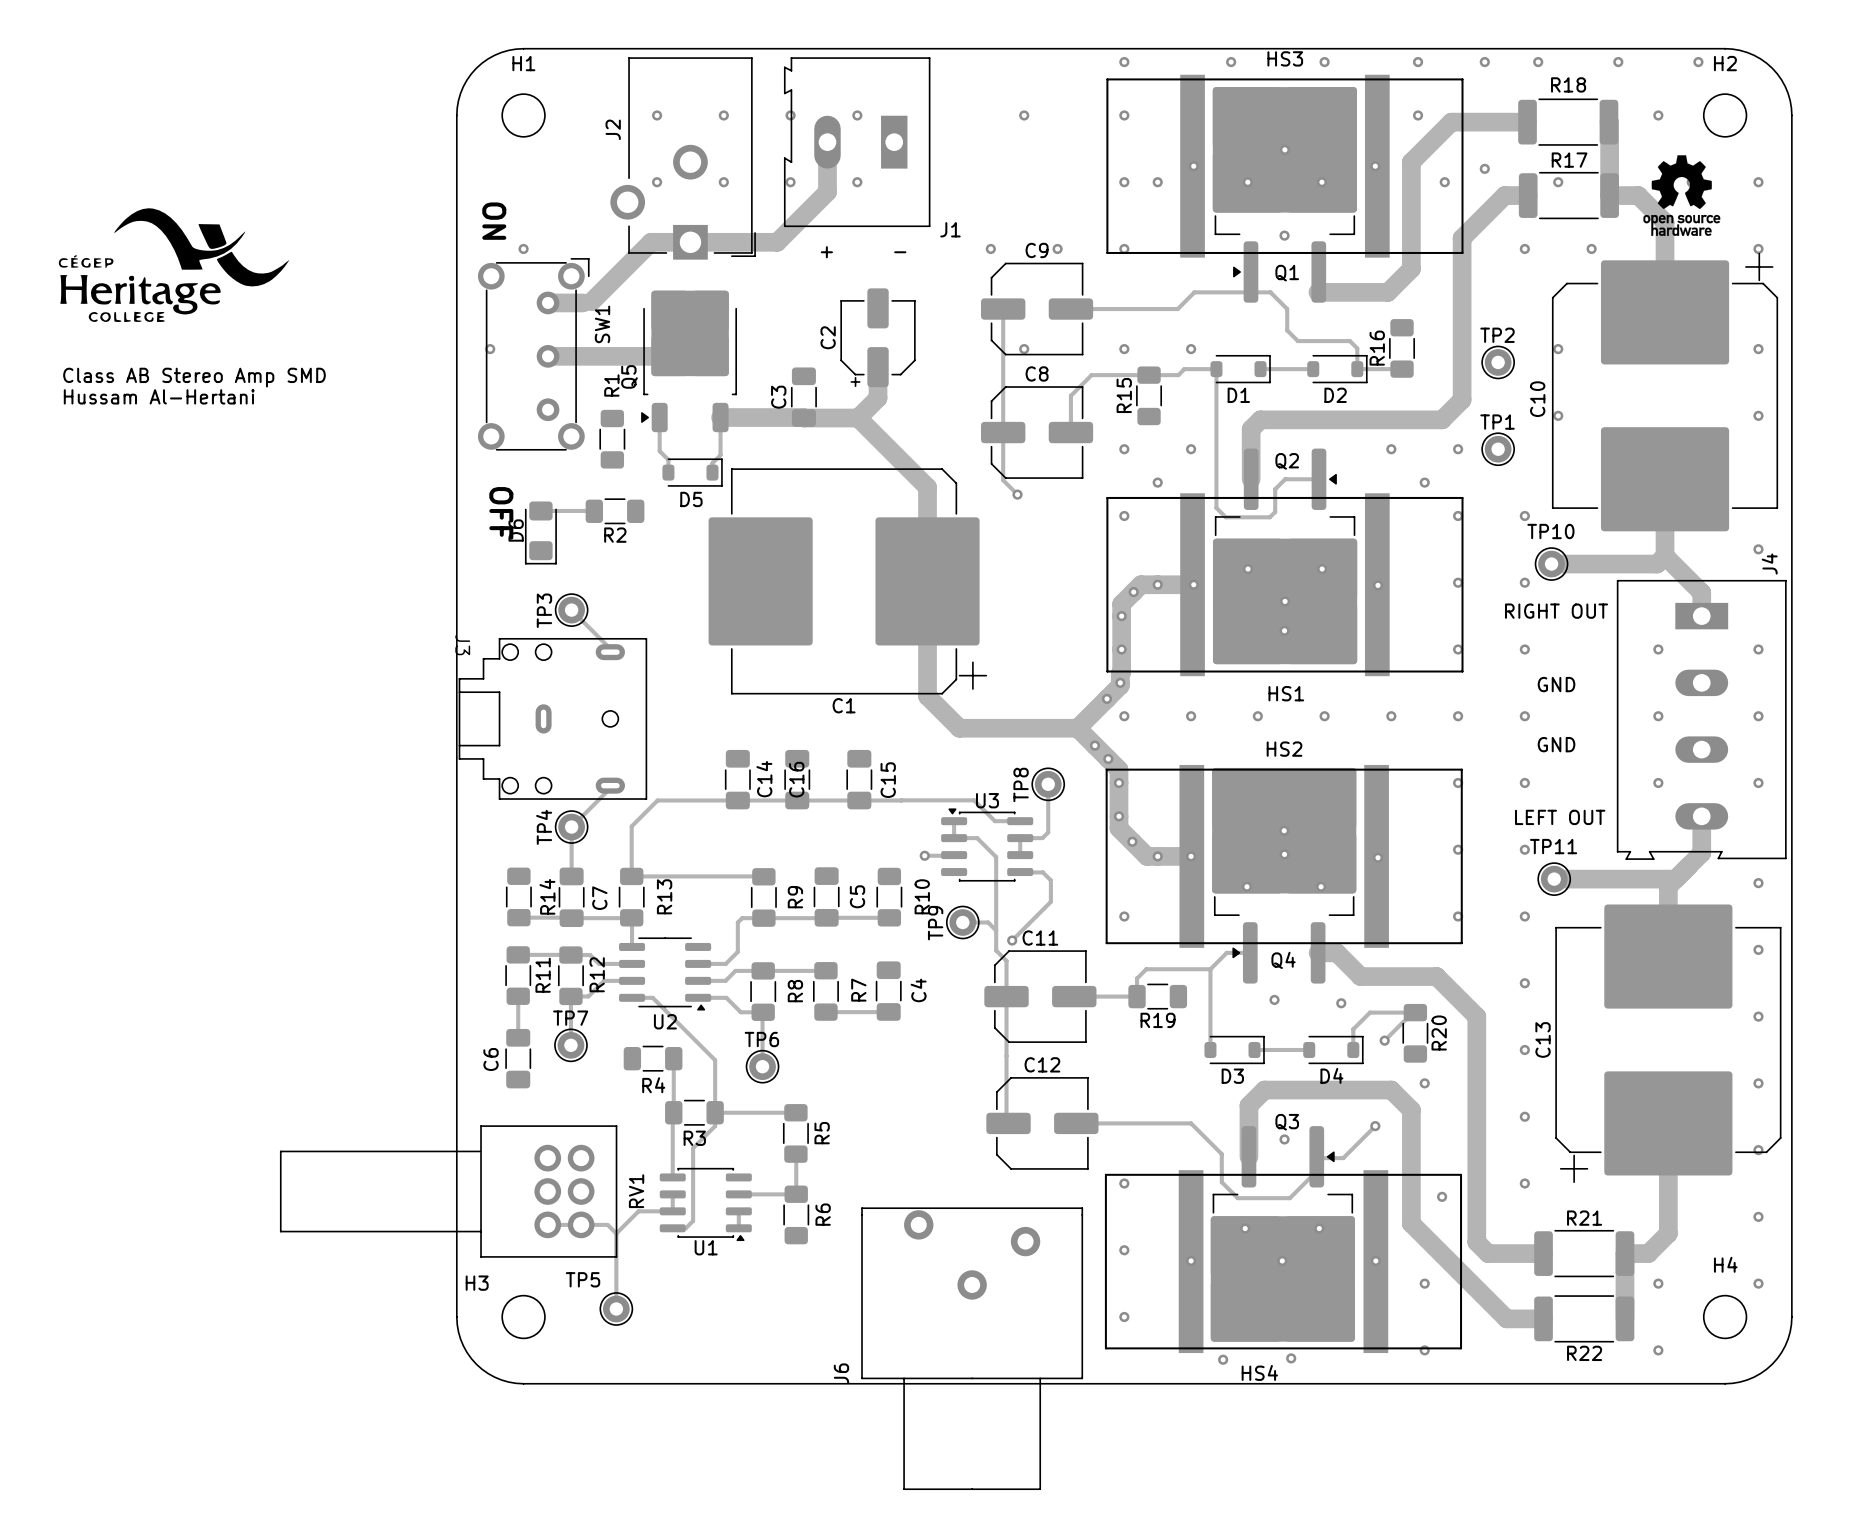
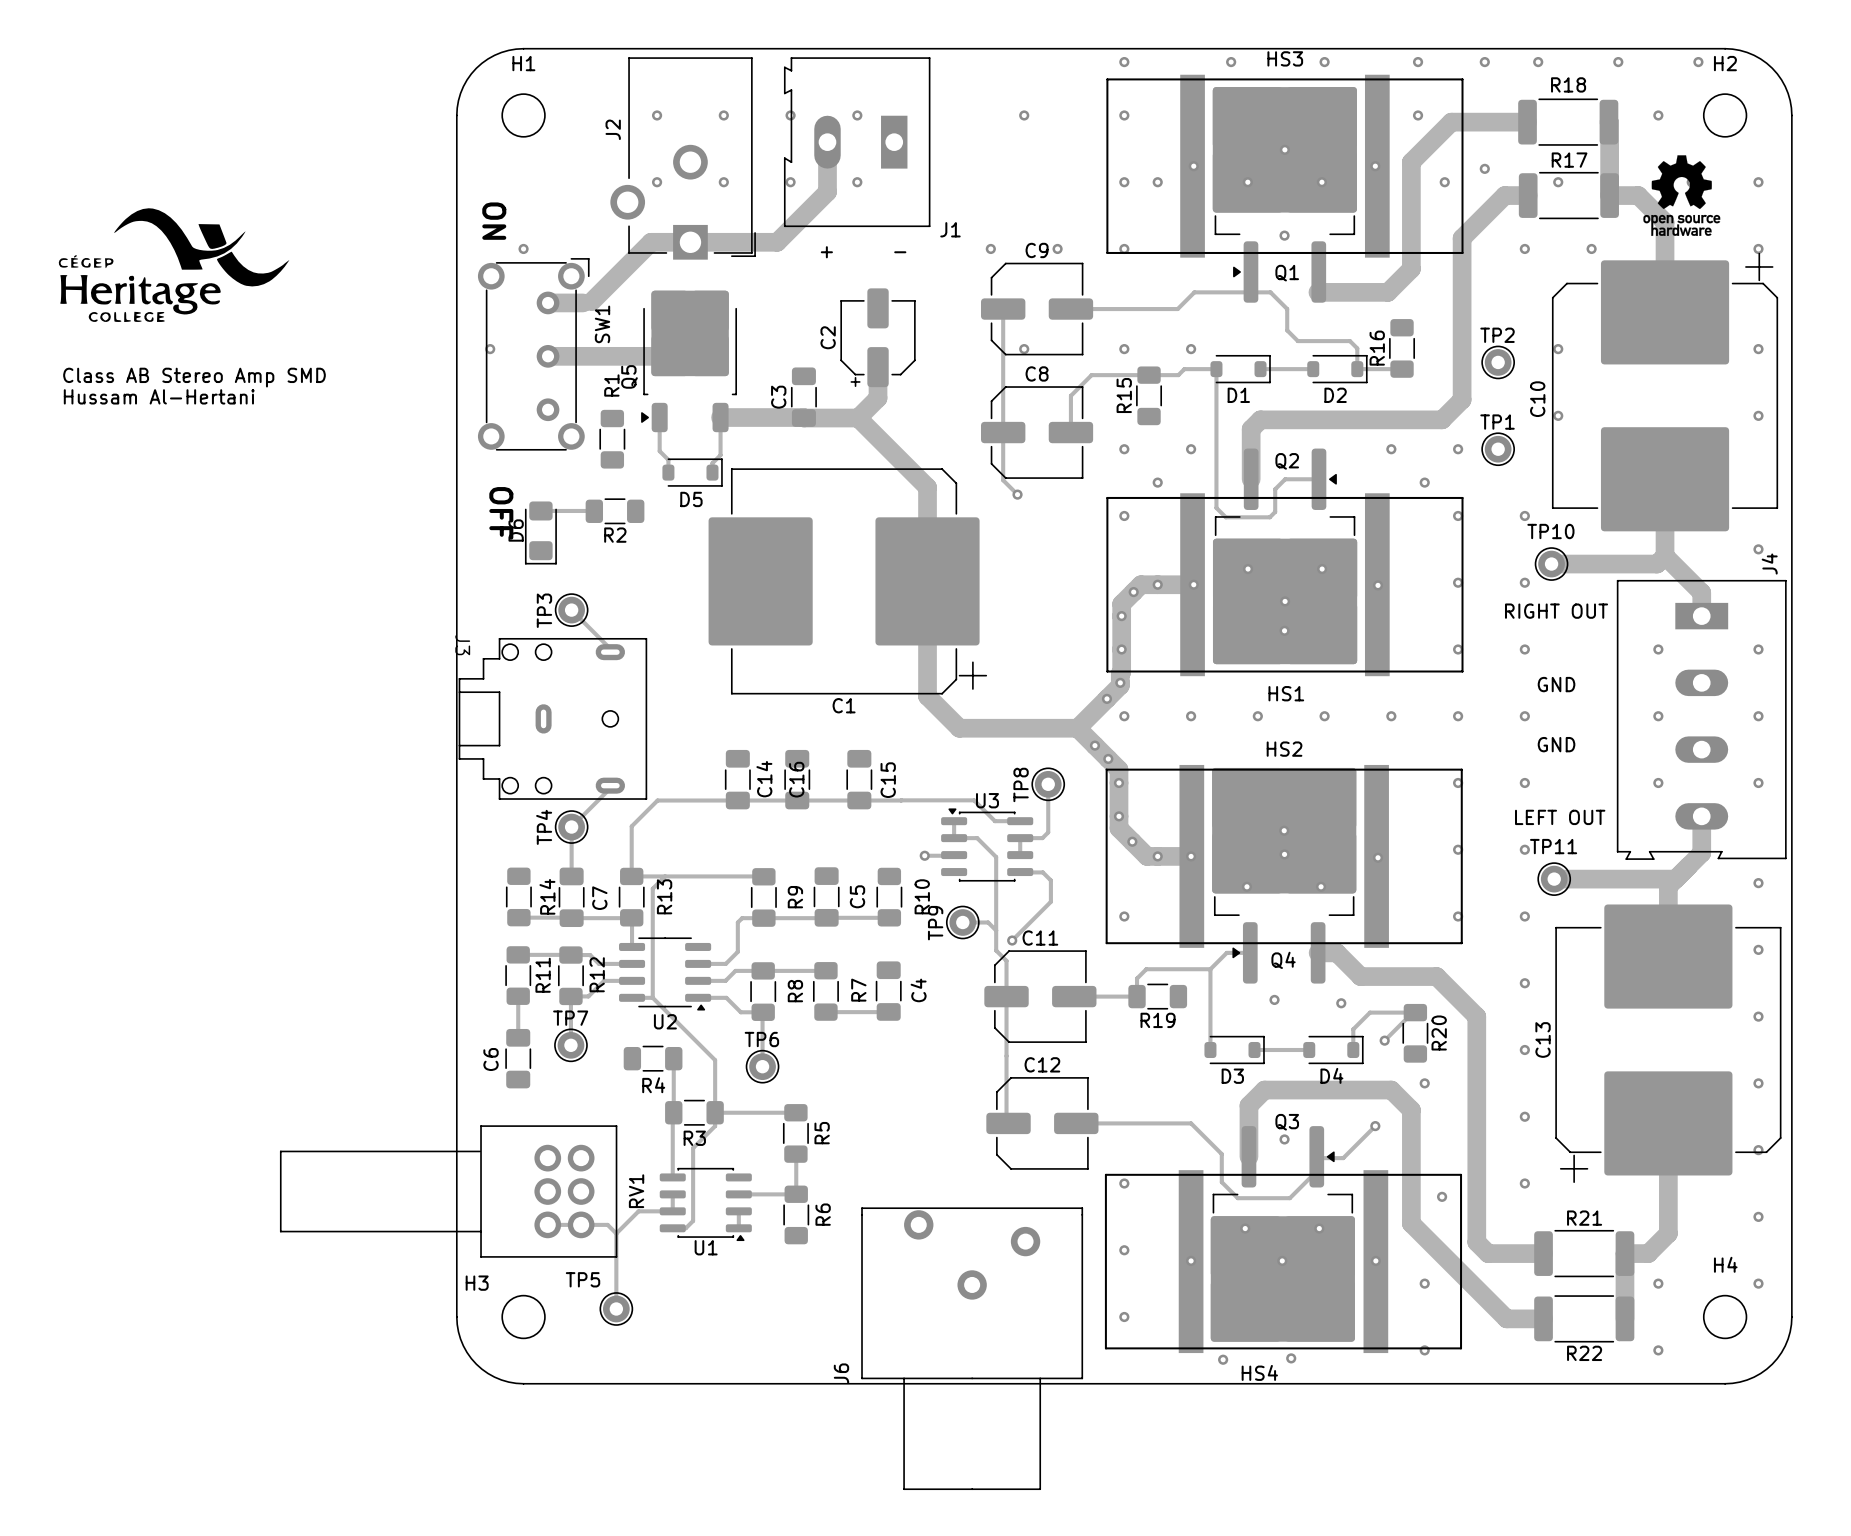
track: none -> (665, 876) (652, 888) (652, 997)

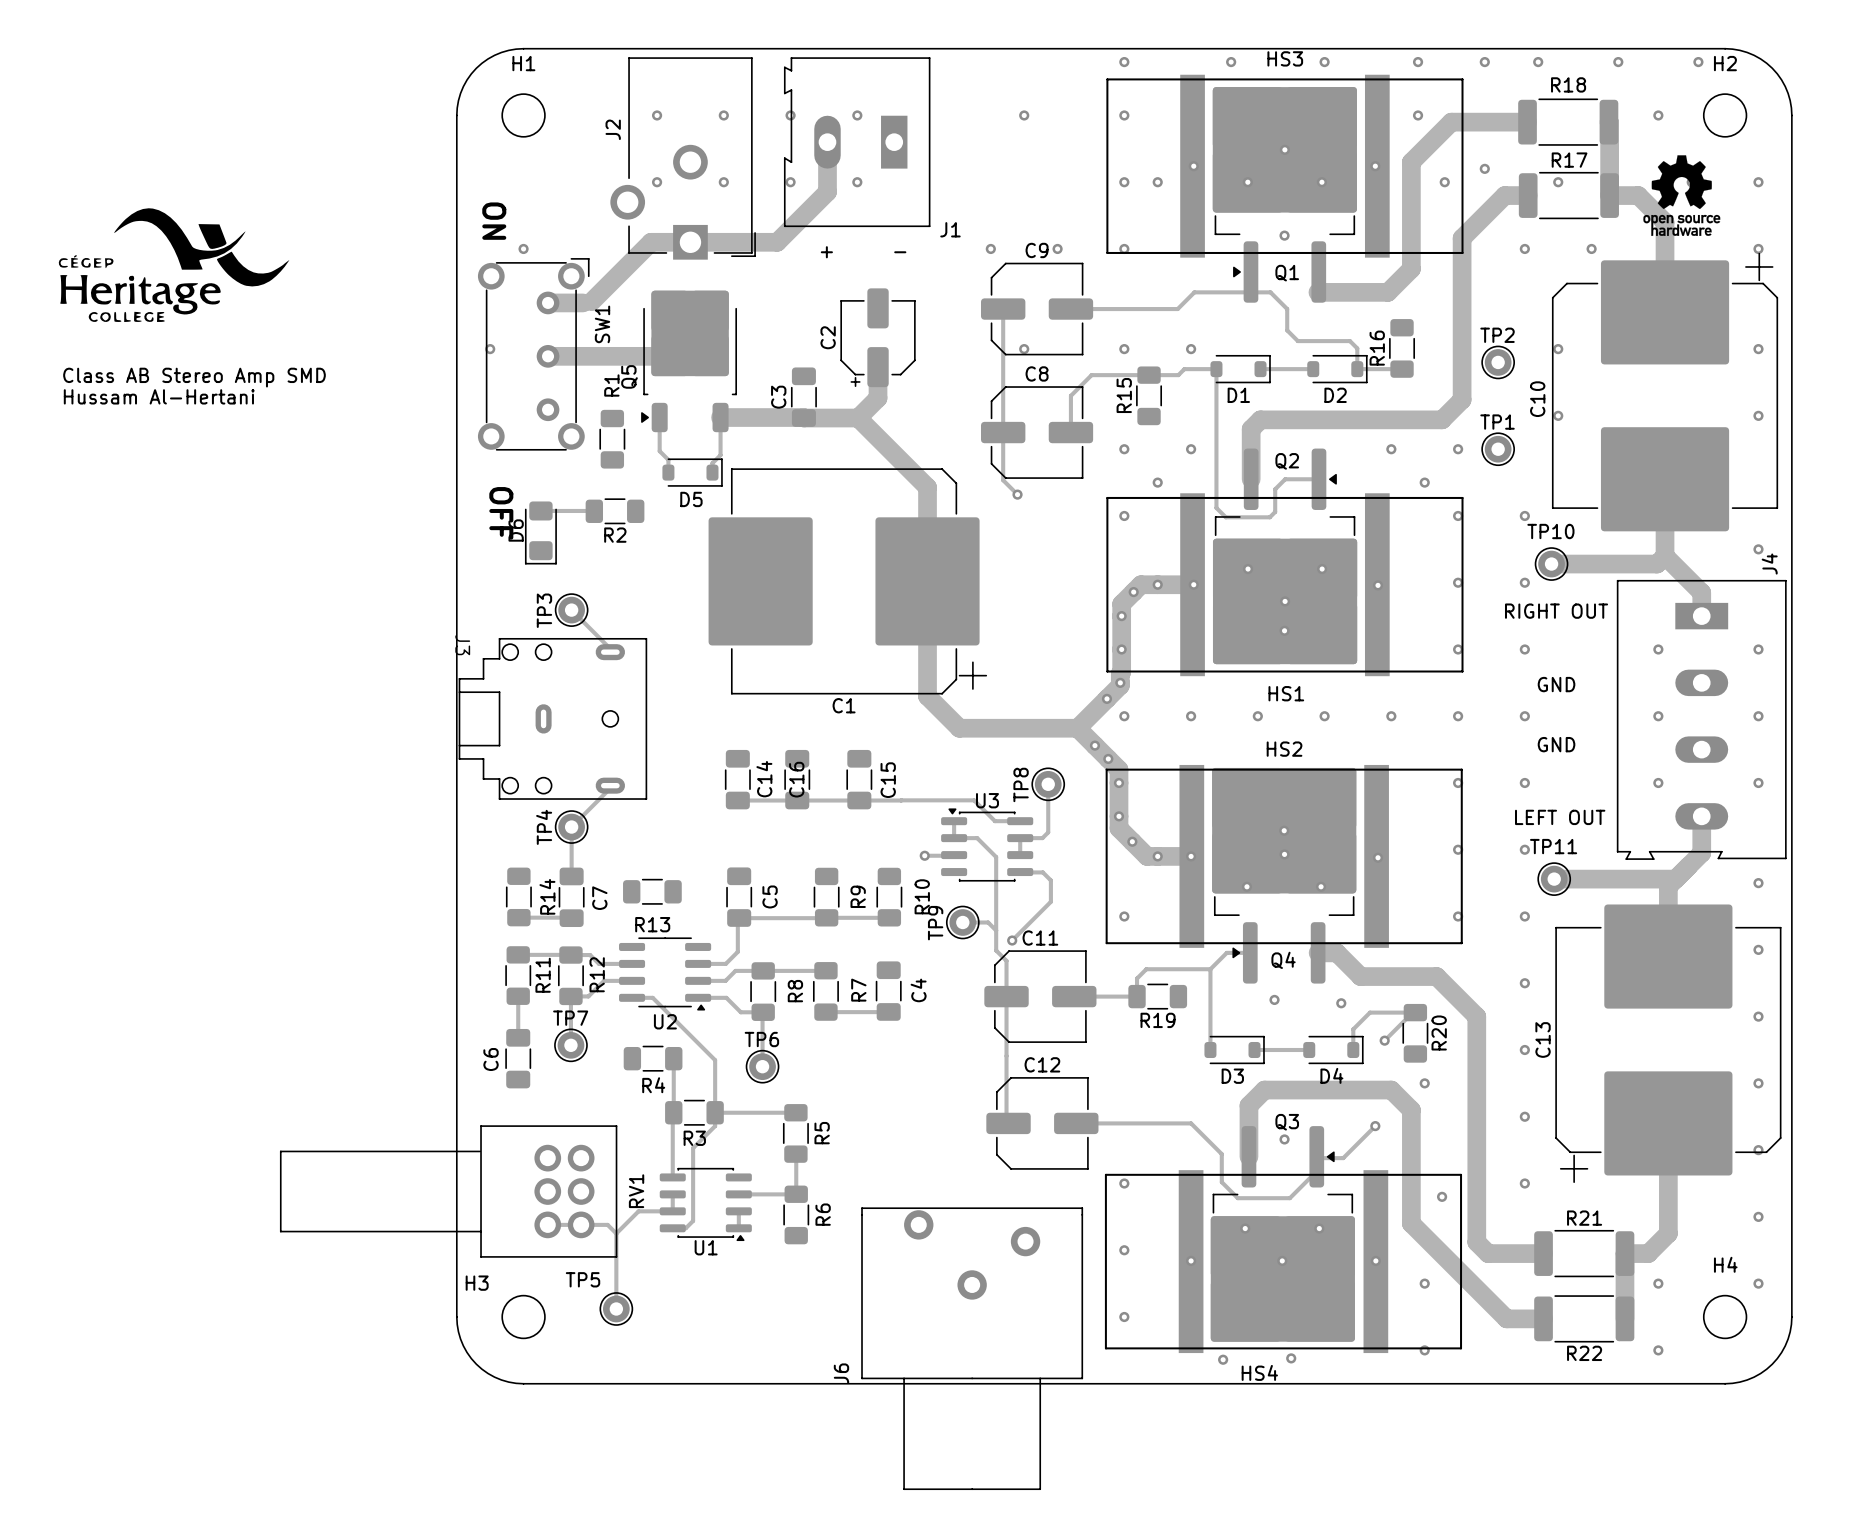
track: (737, 800) (657, 800) (631, 826) (631, 876) (763, 876) -> none
track: (665, 876) (652, 888) (652, 997) -> none
C5 position: (826, 896) -> (739, 897)
R13 rotation: 0° (631, 897) -> 90° clockwise (652, 891)
R9 position: (763, 897) -> (826, 897)
track: (571, 918) (631, 917) (632, 946) -> none

